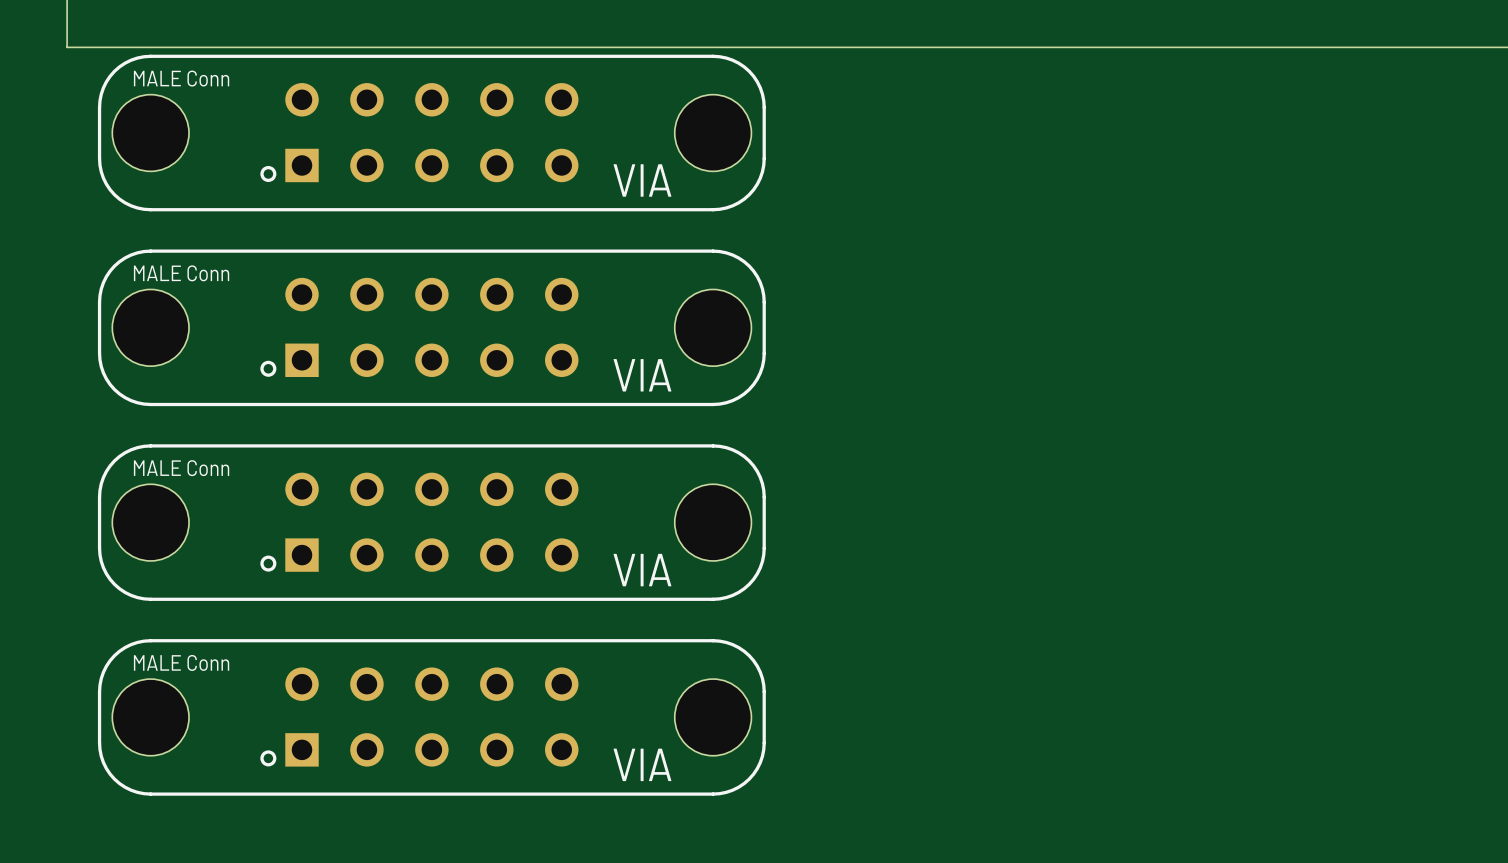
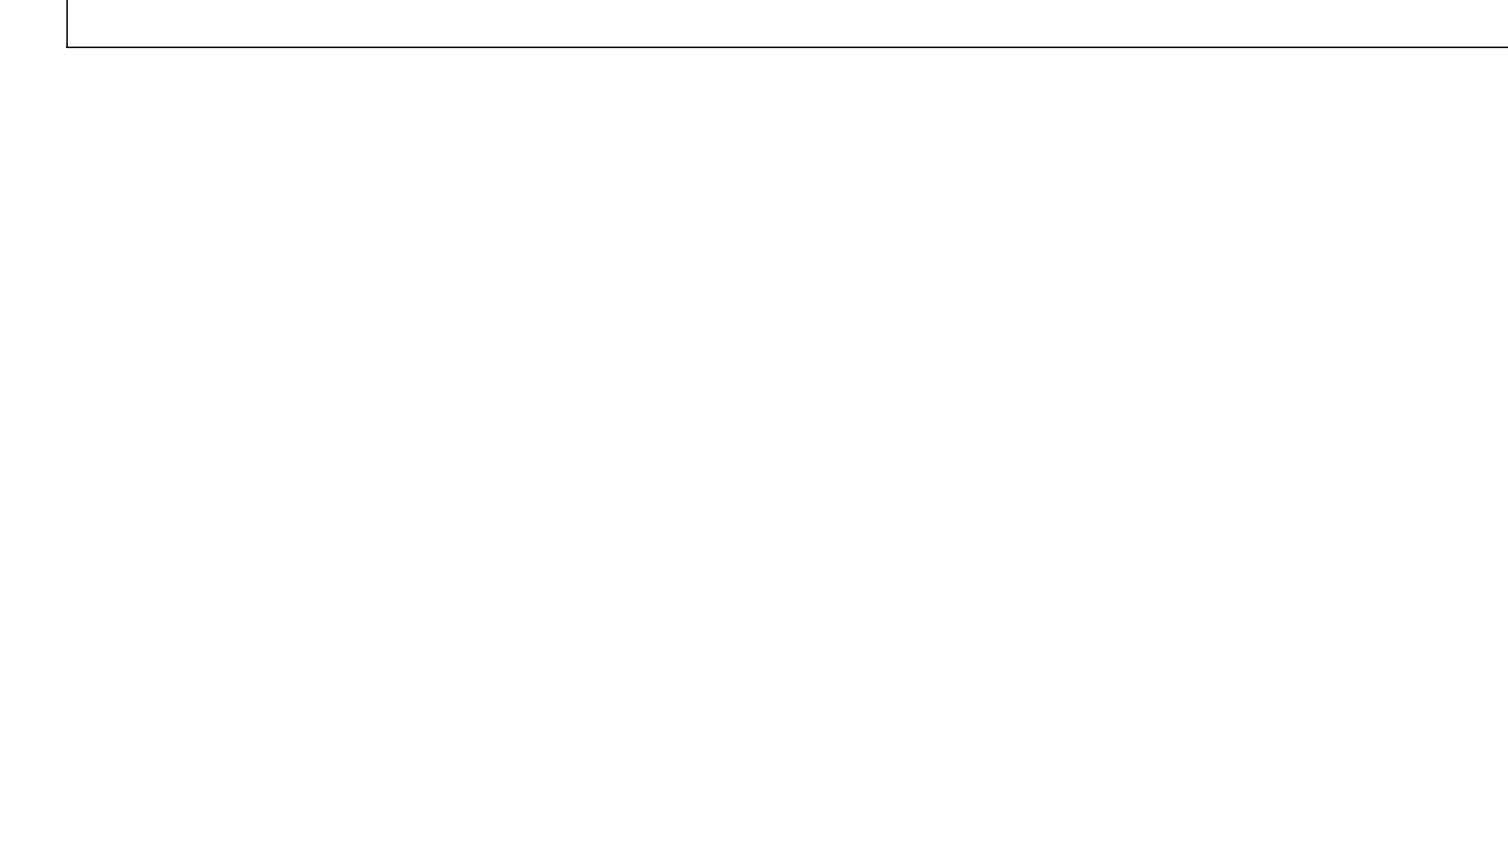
part: (431, 133) -> none
part: (431, 327) -> none
part: (431, 522) -> none
part: (431, 717) -> none

